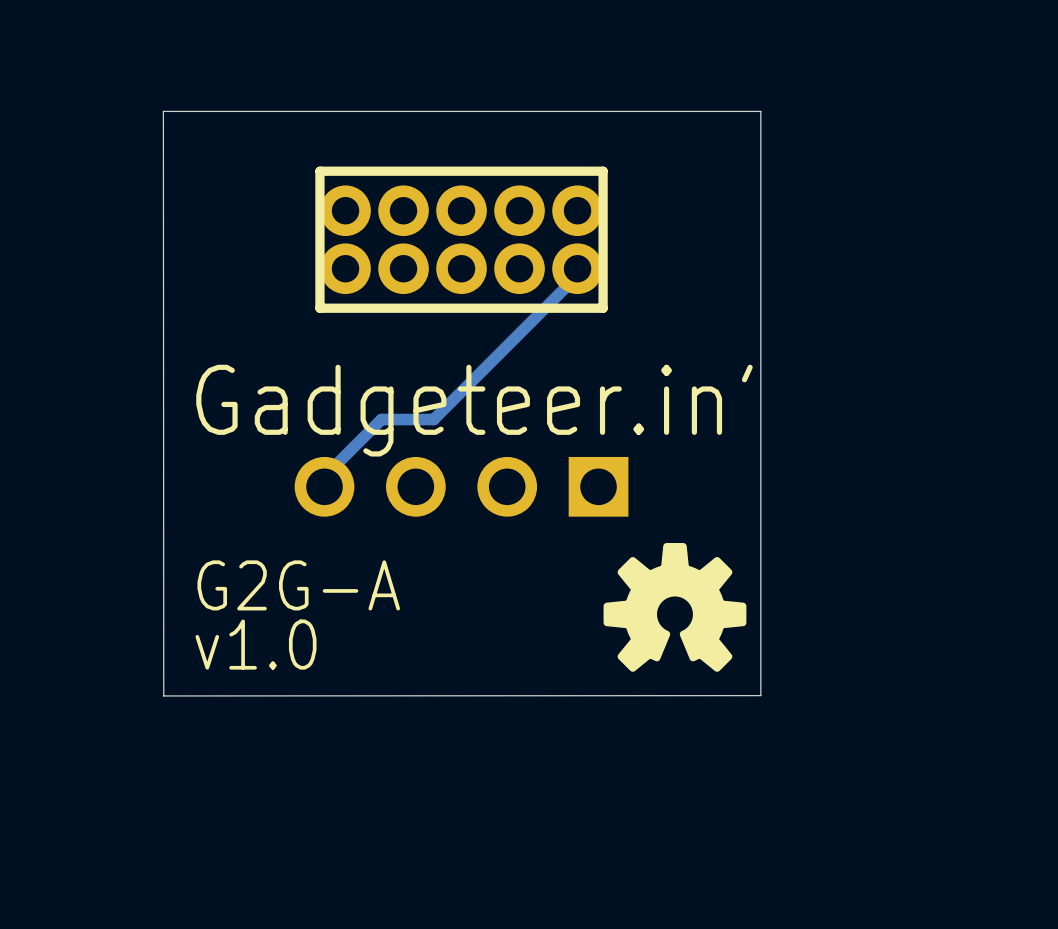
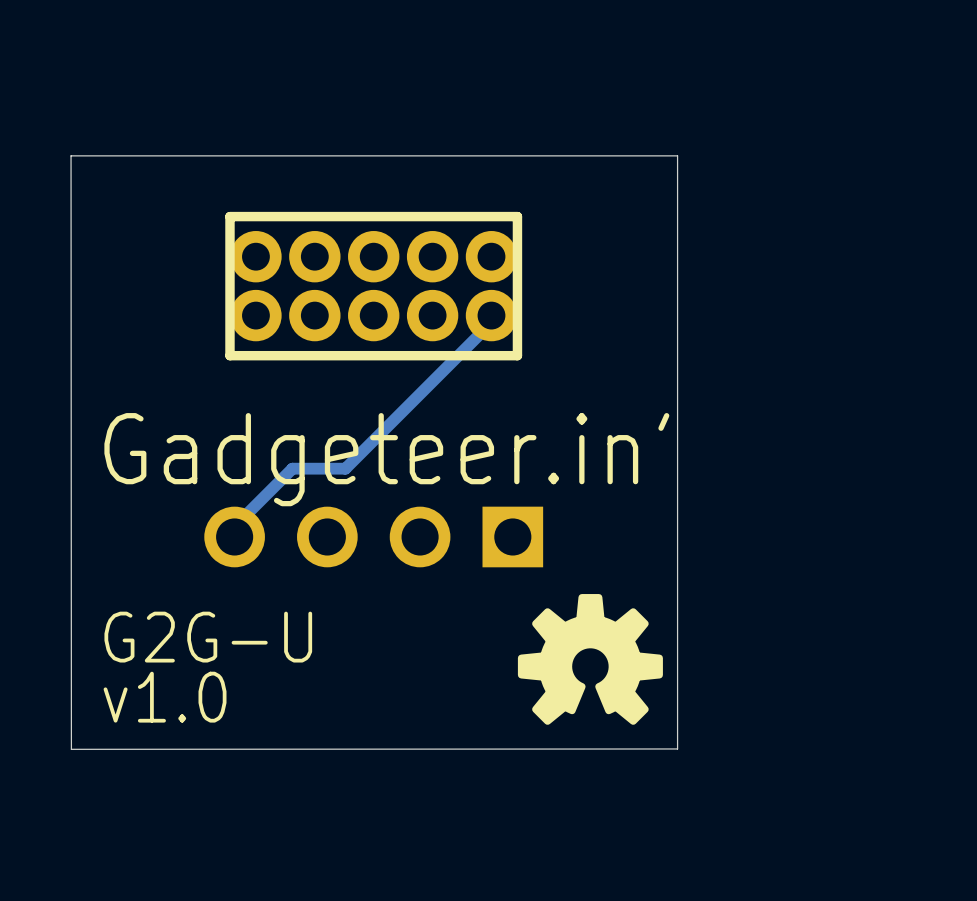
text: G2G-A (298, 585) -> G2G-U (208, 637)

